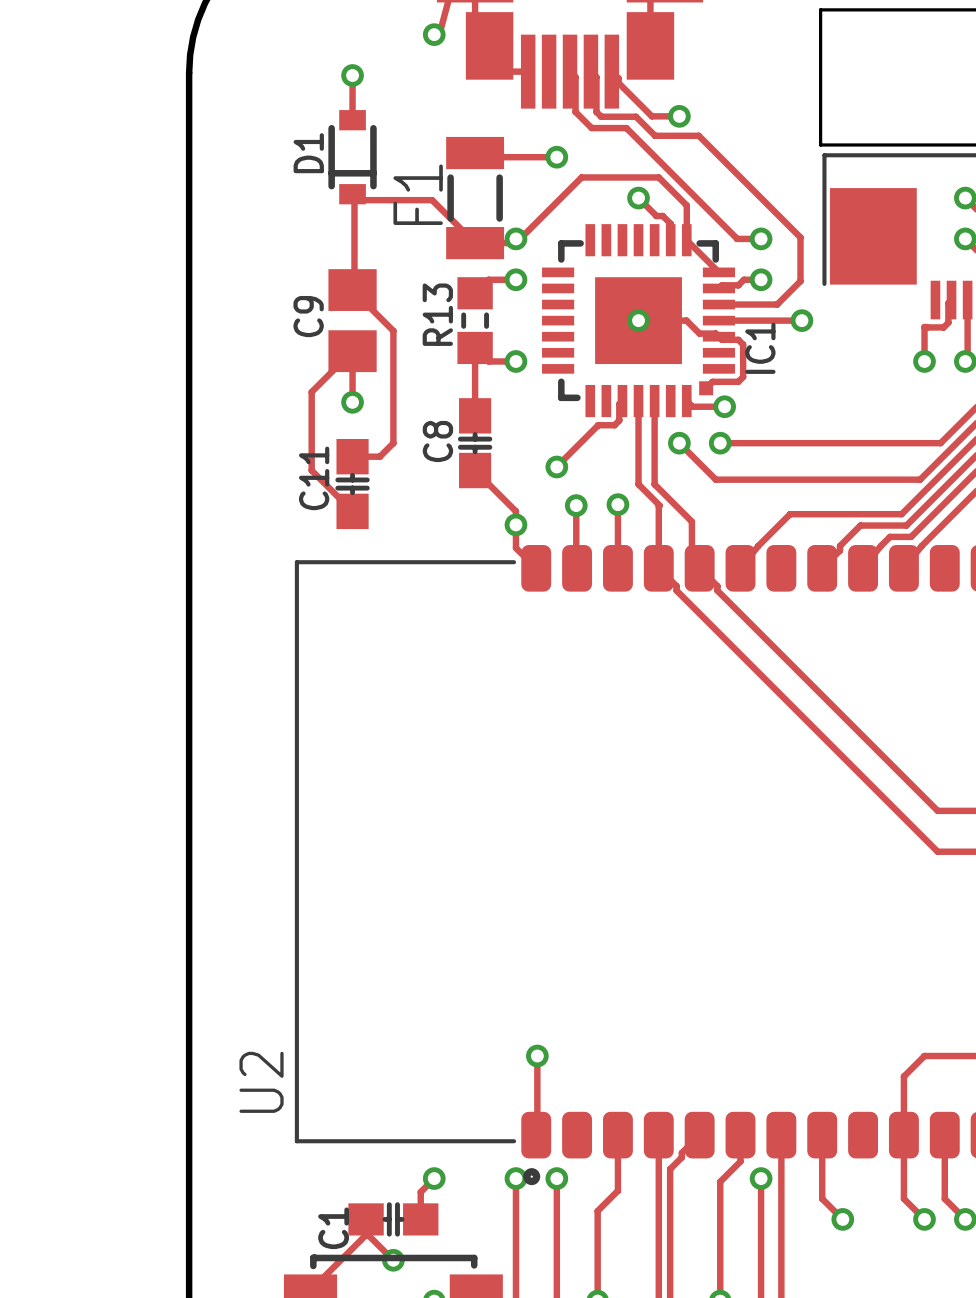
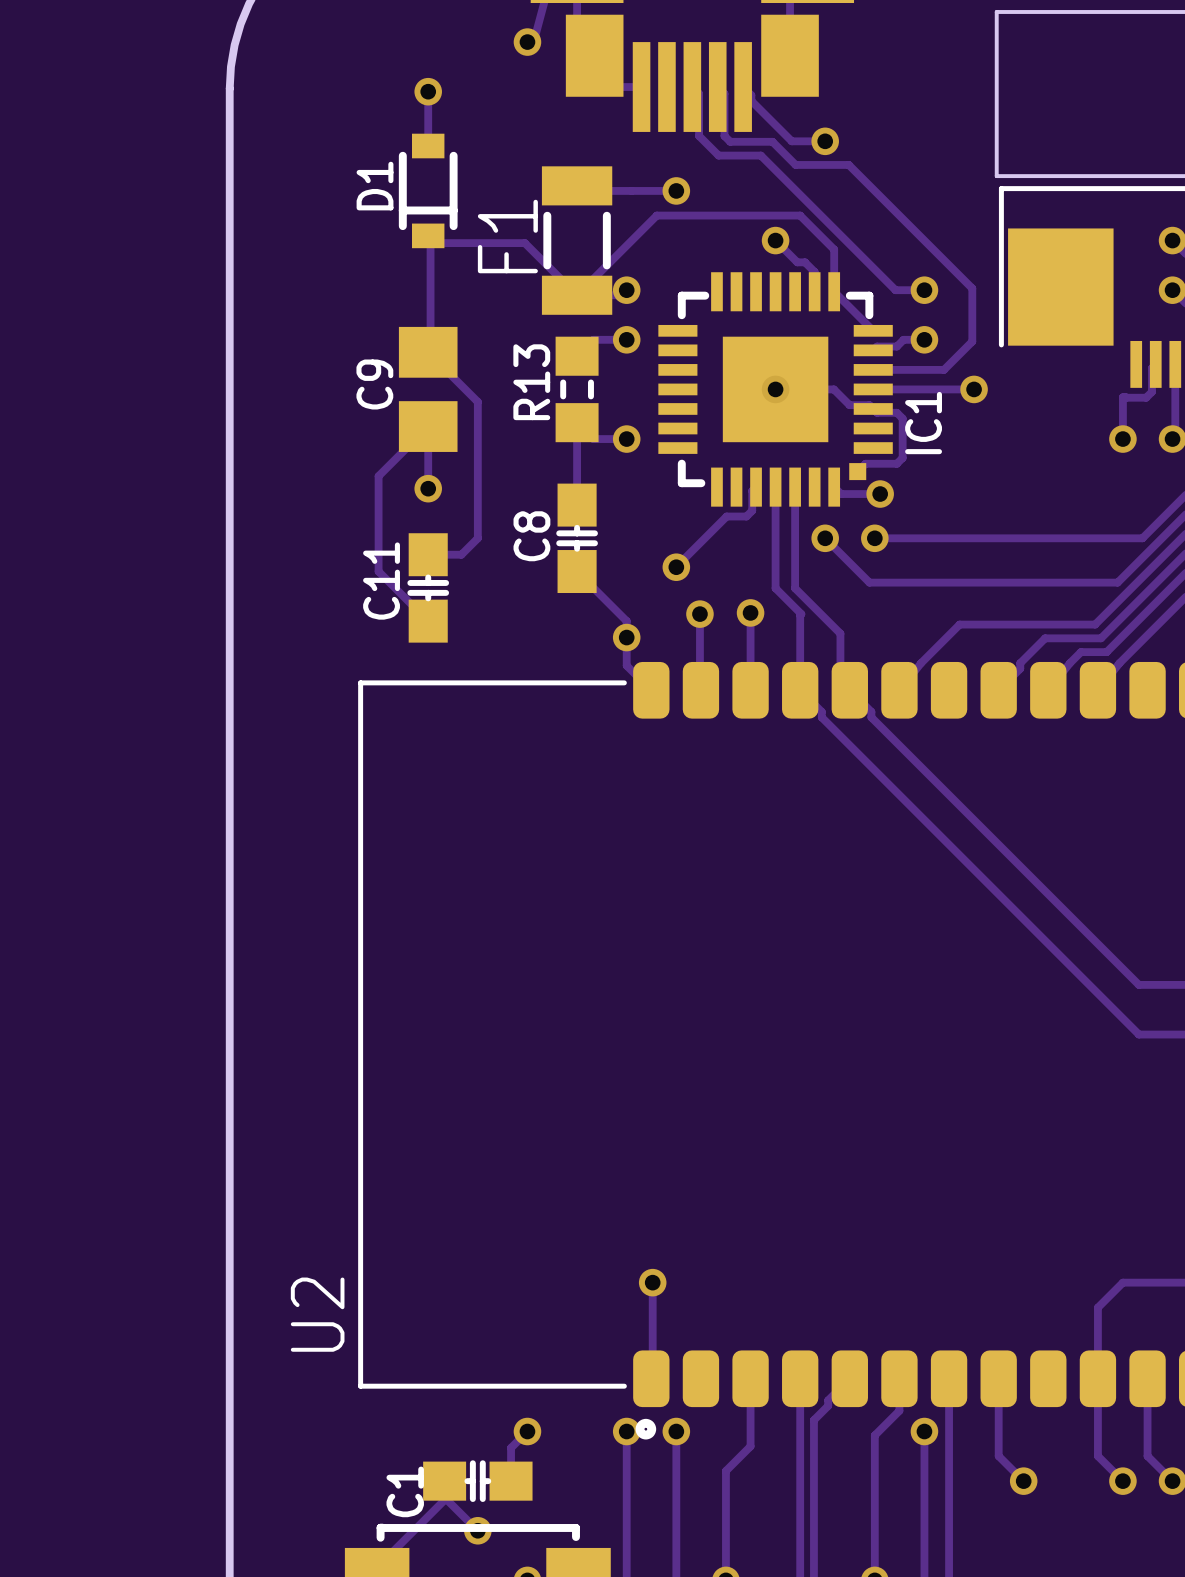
track: (581, 177) (518, 241) (515, 238) -> (706, 215) (656, 215) (579, 292)

